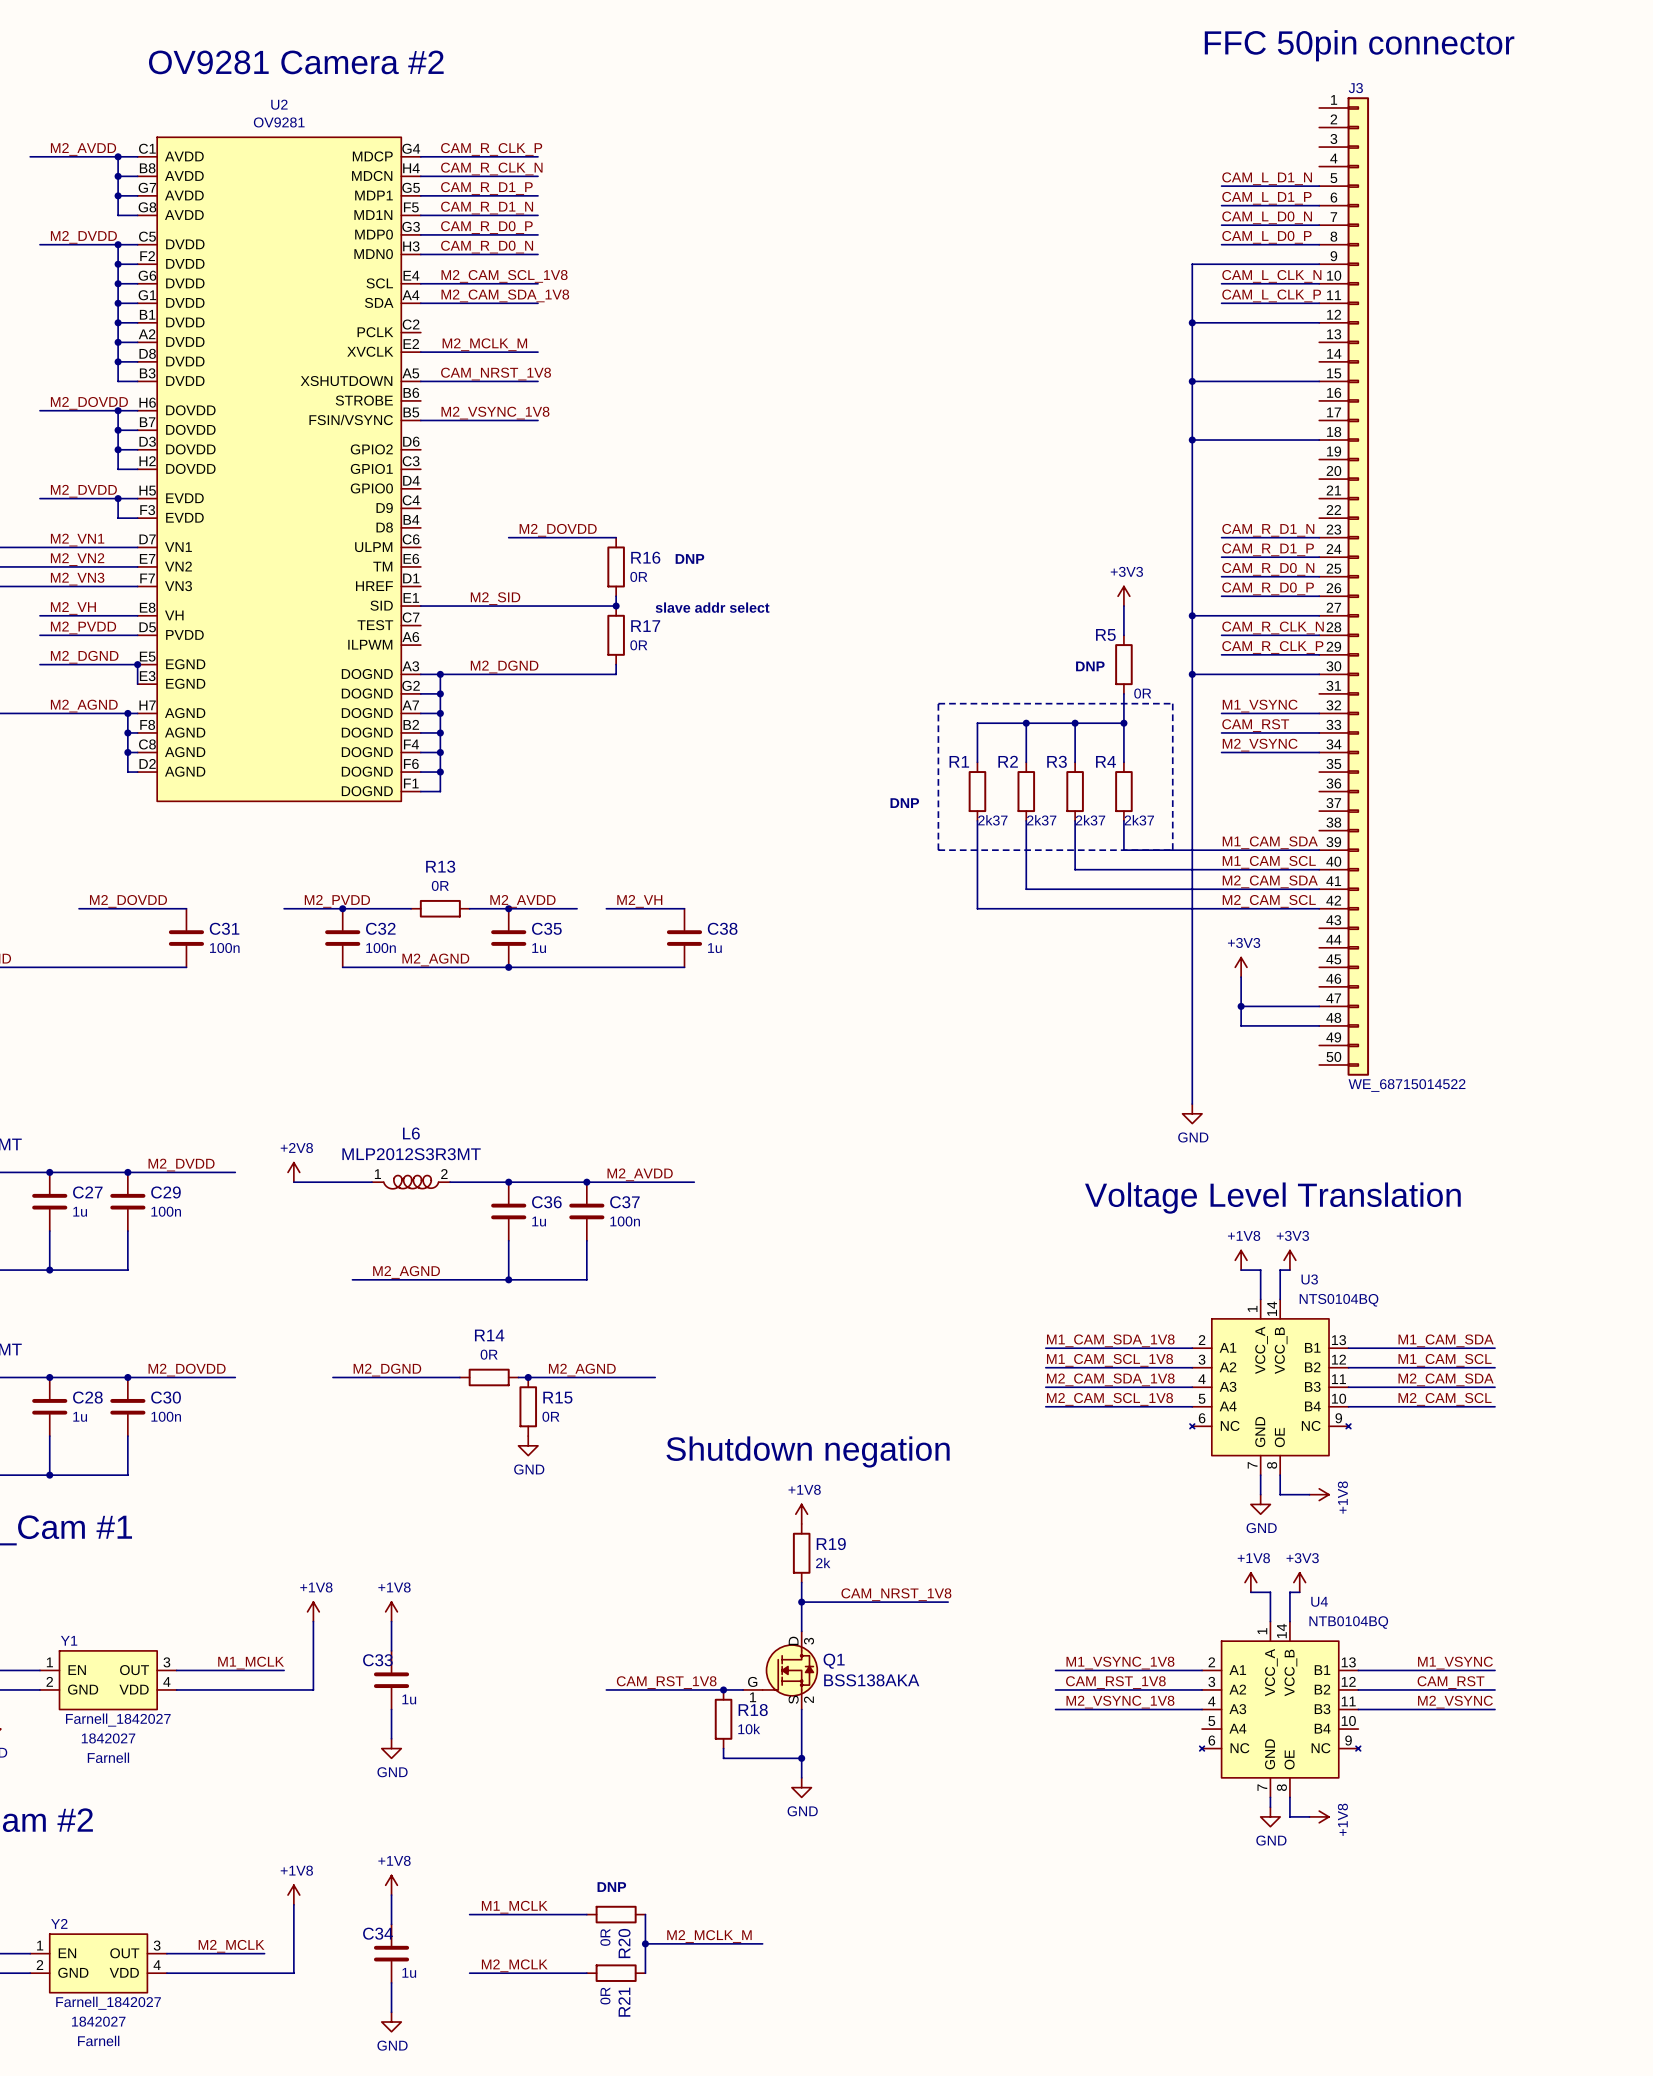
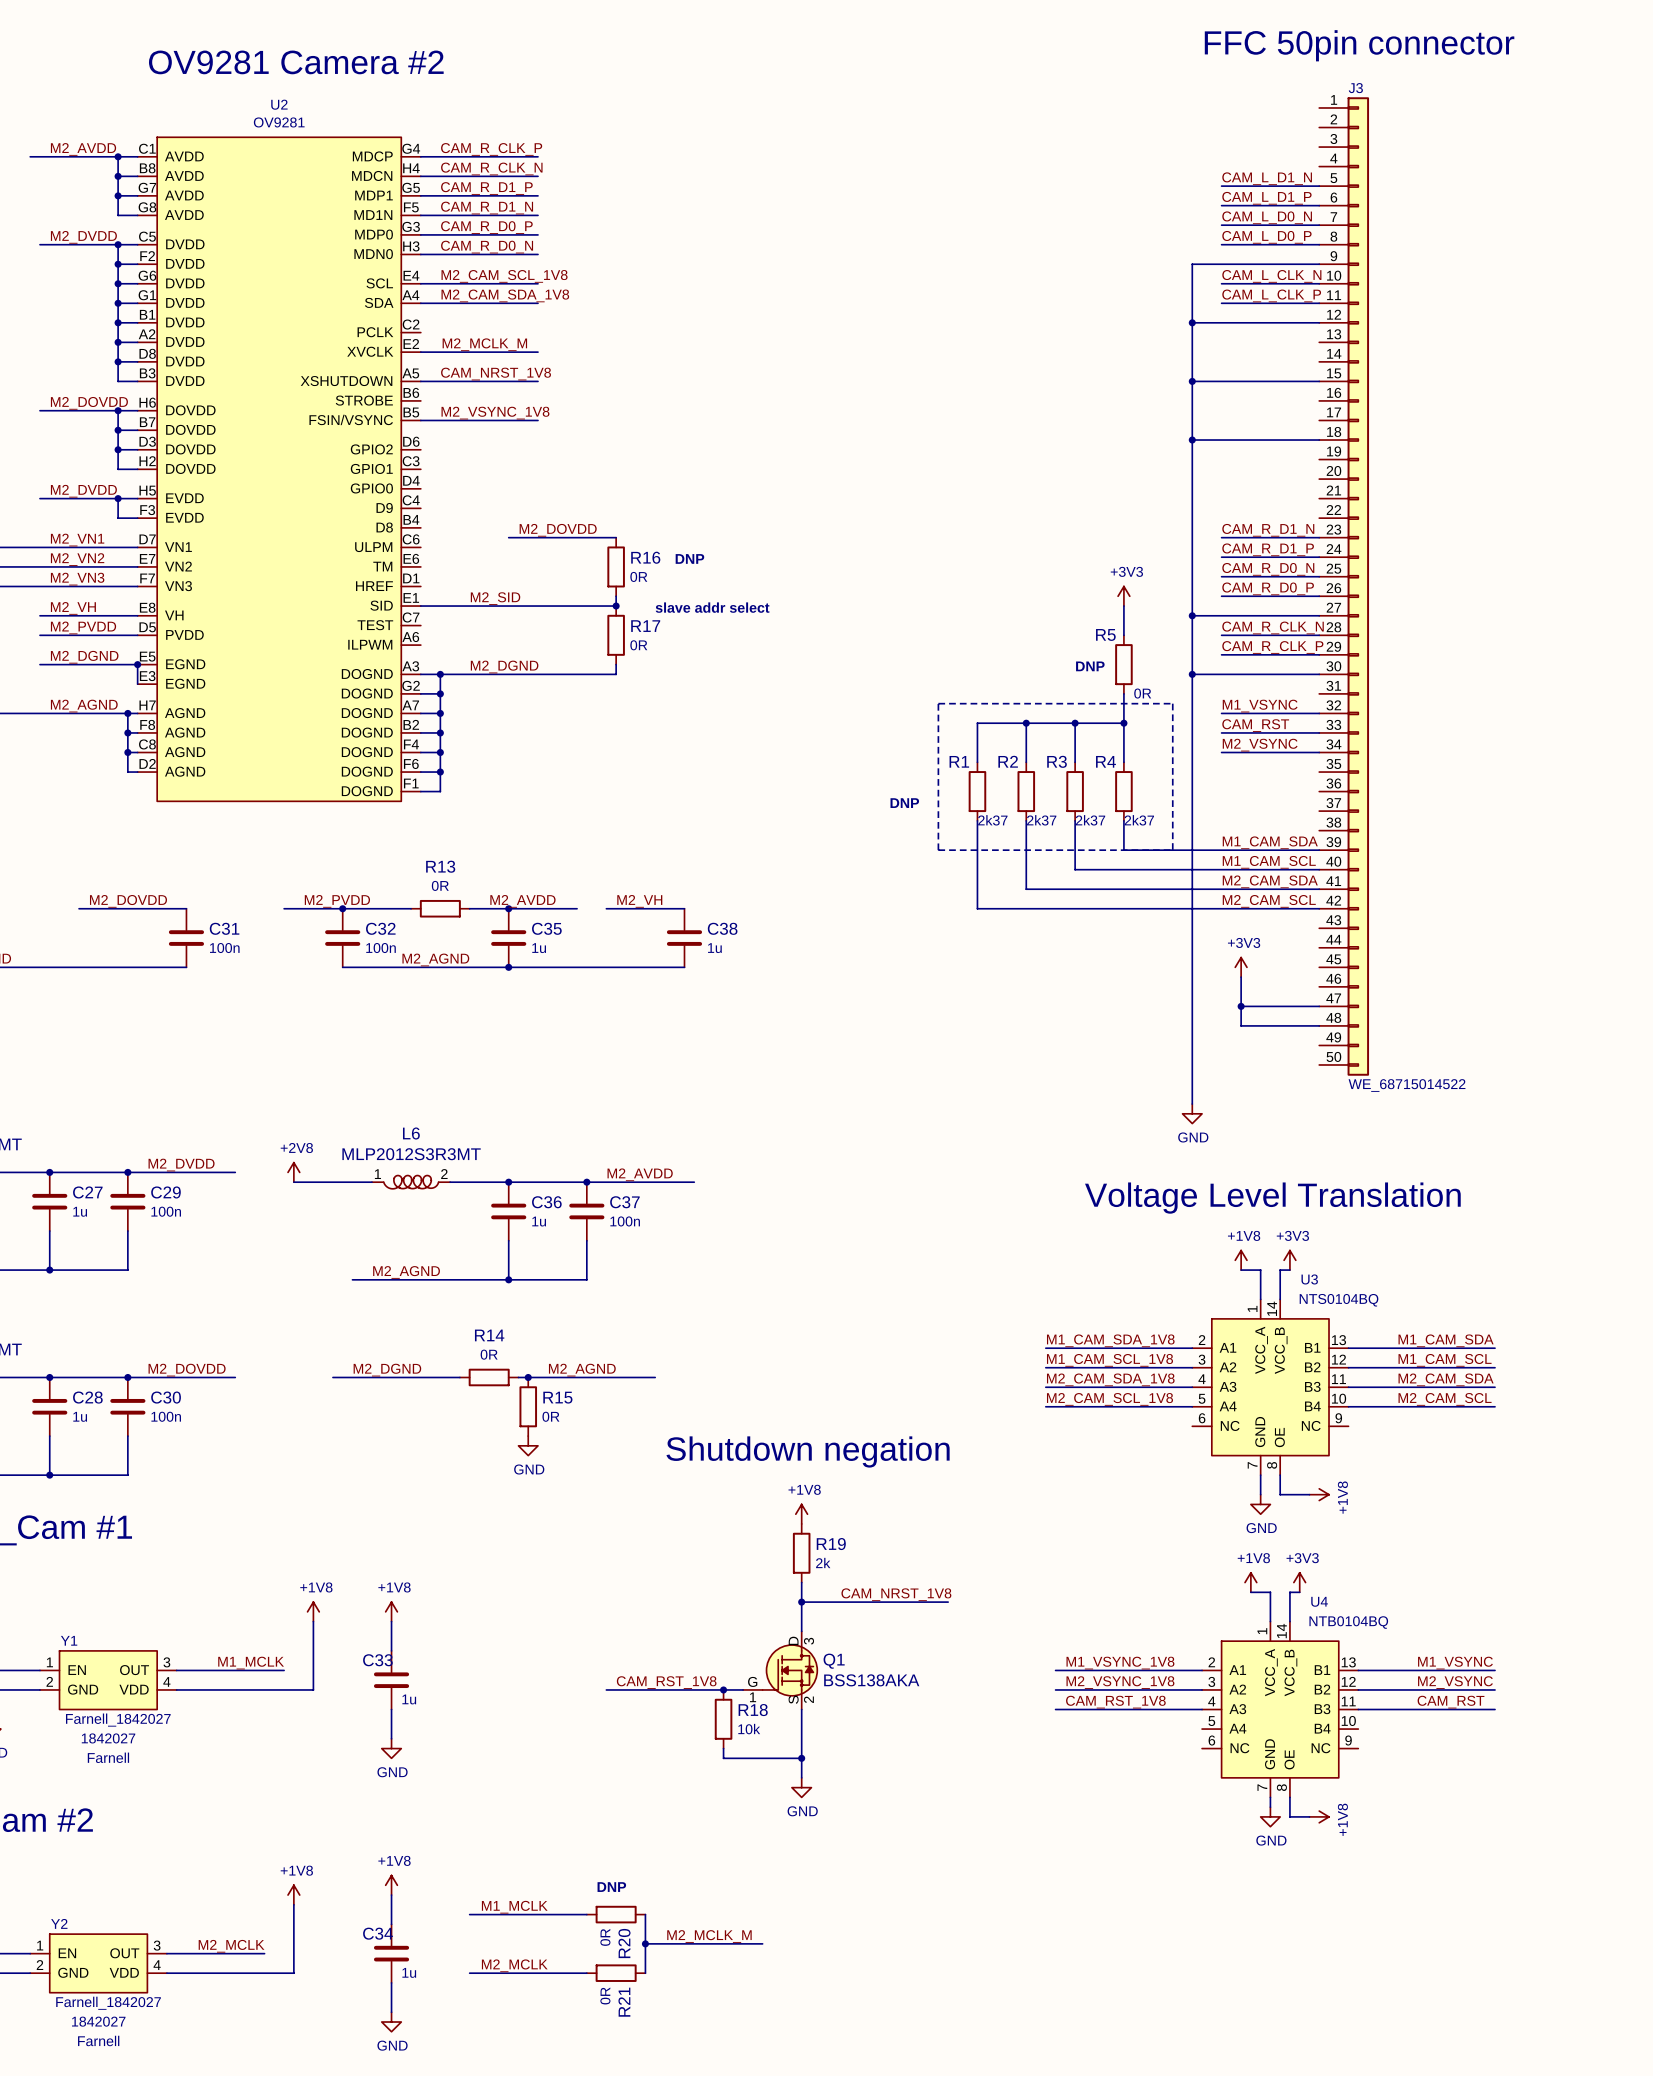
U3 symbol: [1189, 1299, 1351, 1476] -> [1192, 1299, 1349, 1476]
U4 symbol: [1199, 1621, 1361, 1798] -> [1202, 1621, 1359, 1798]
label: CAM_RST_1V8 (1115, 1682) -> M2_VSYNC_1V8 (1120, 1682)
label: CAM_RST (1451, 1682) -> M2_VSYNC (1455, 1682)
label: M2_VSYNC_1V8 (1120, 1702) -> CAM_RST_1V8 (1115, 1702)
label: M2_VSYNC (1455, 1702) -> CAM_RST (1451, 1702)

